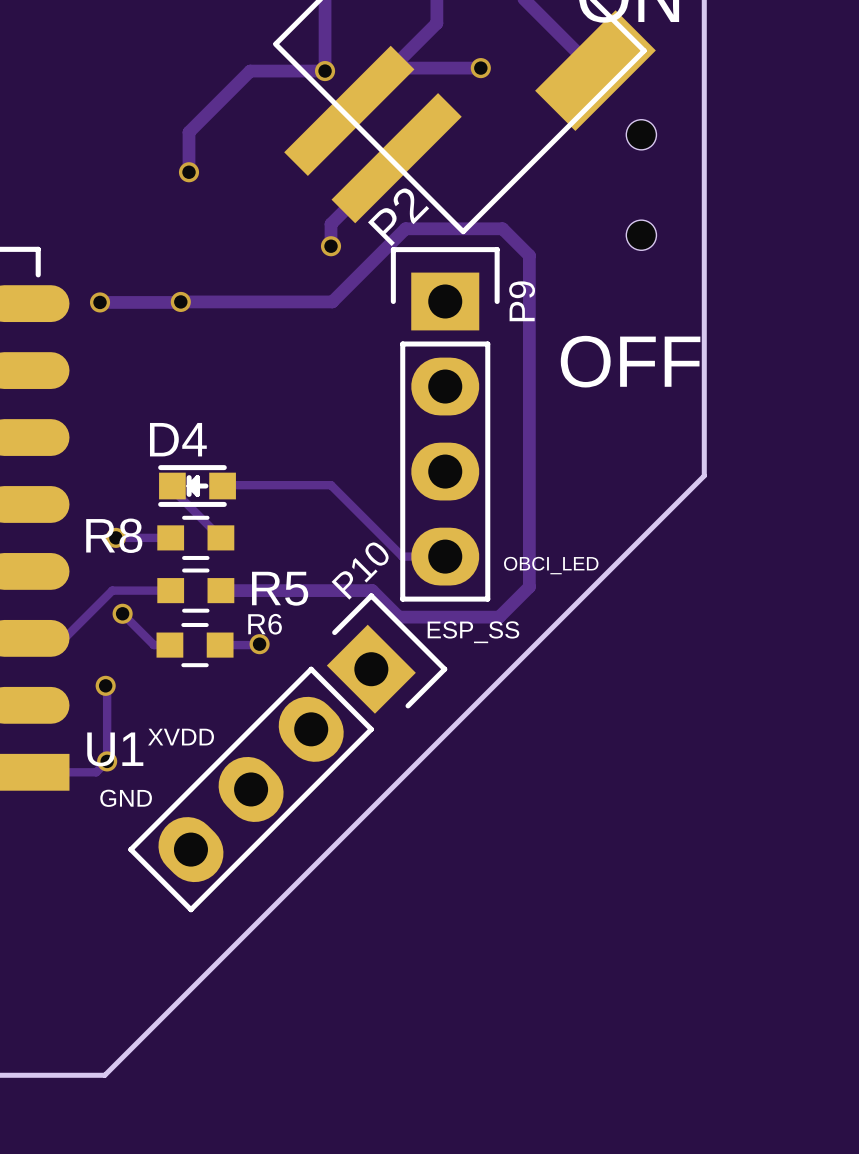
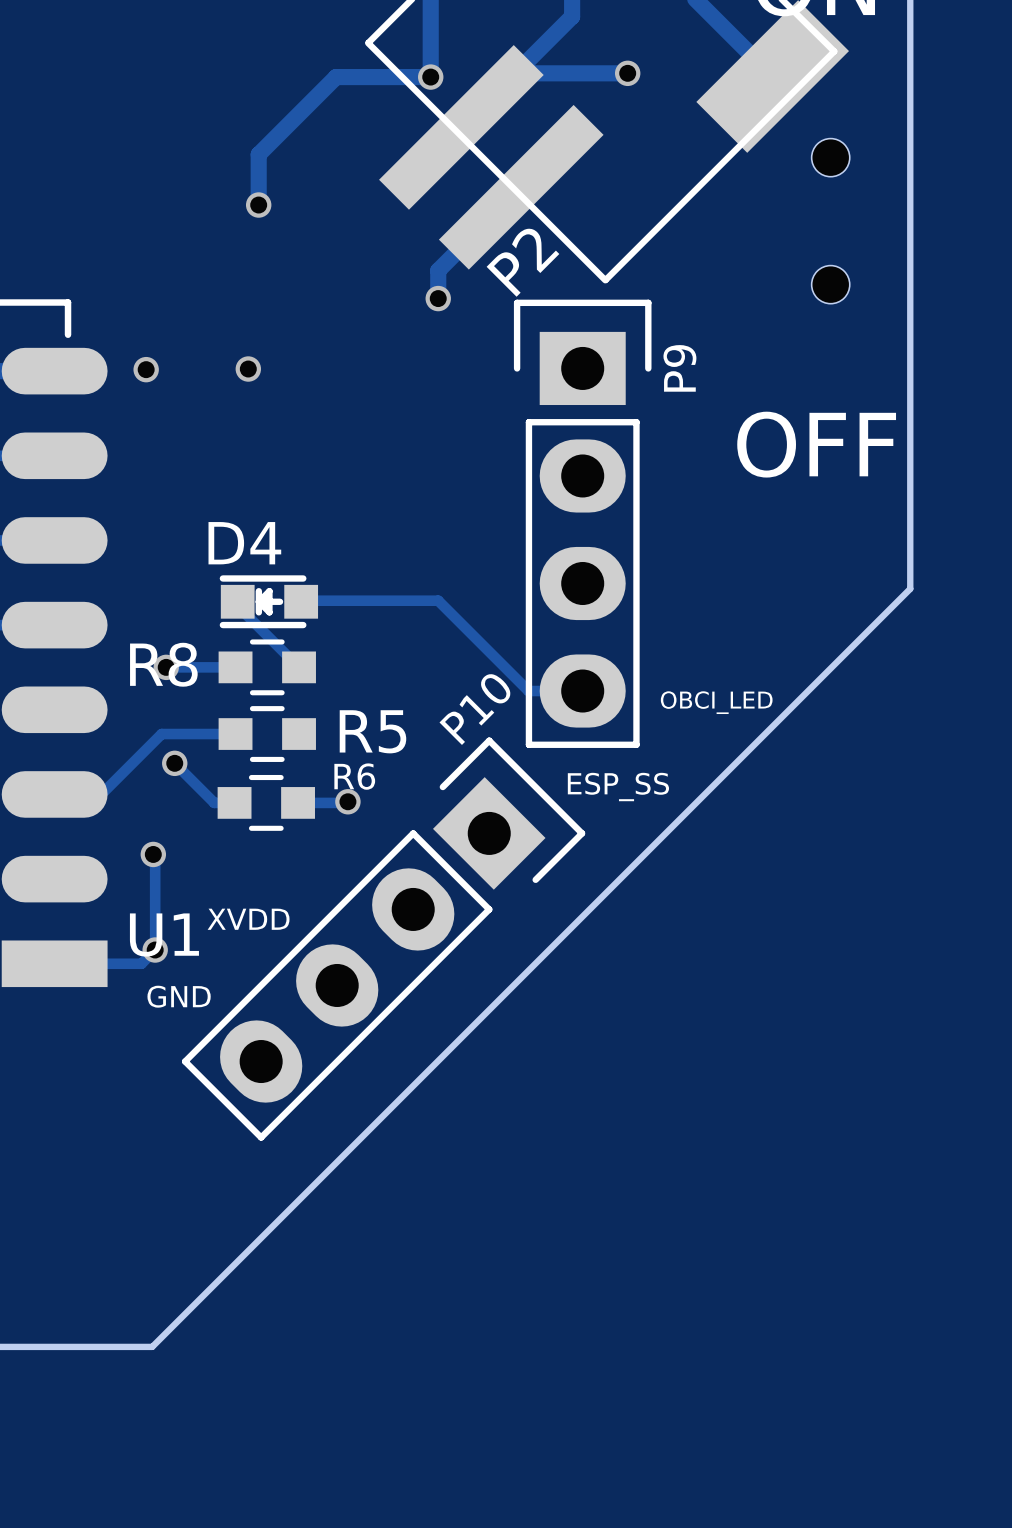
track: (100, 302) (332, 301) (405, 228) (502, 228) (529, 255) (529, 587) (499, 617) (398, 617) (372, 590) (220, 590) -> none

